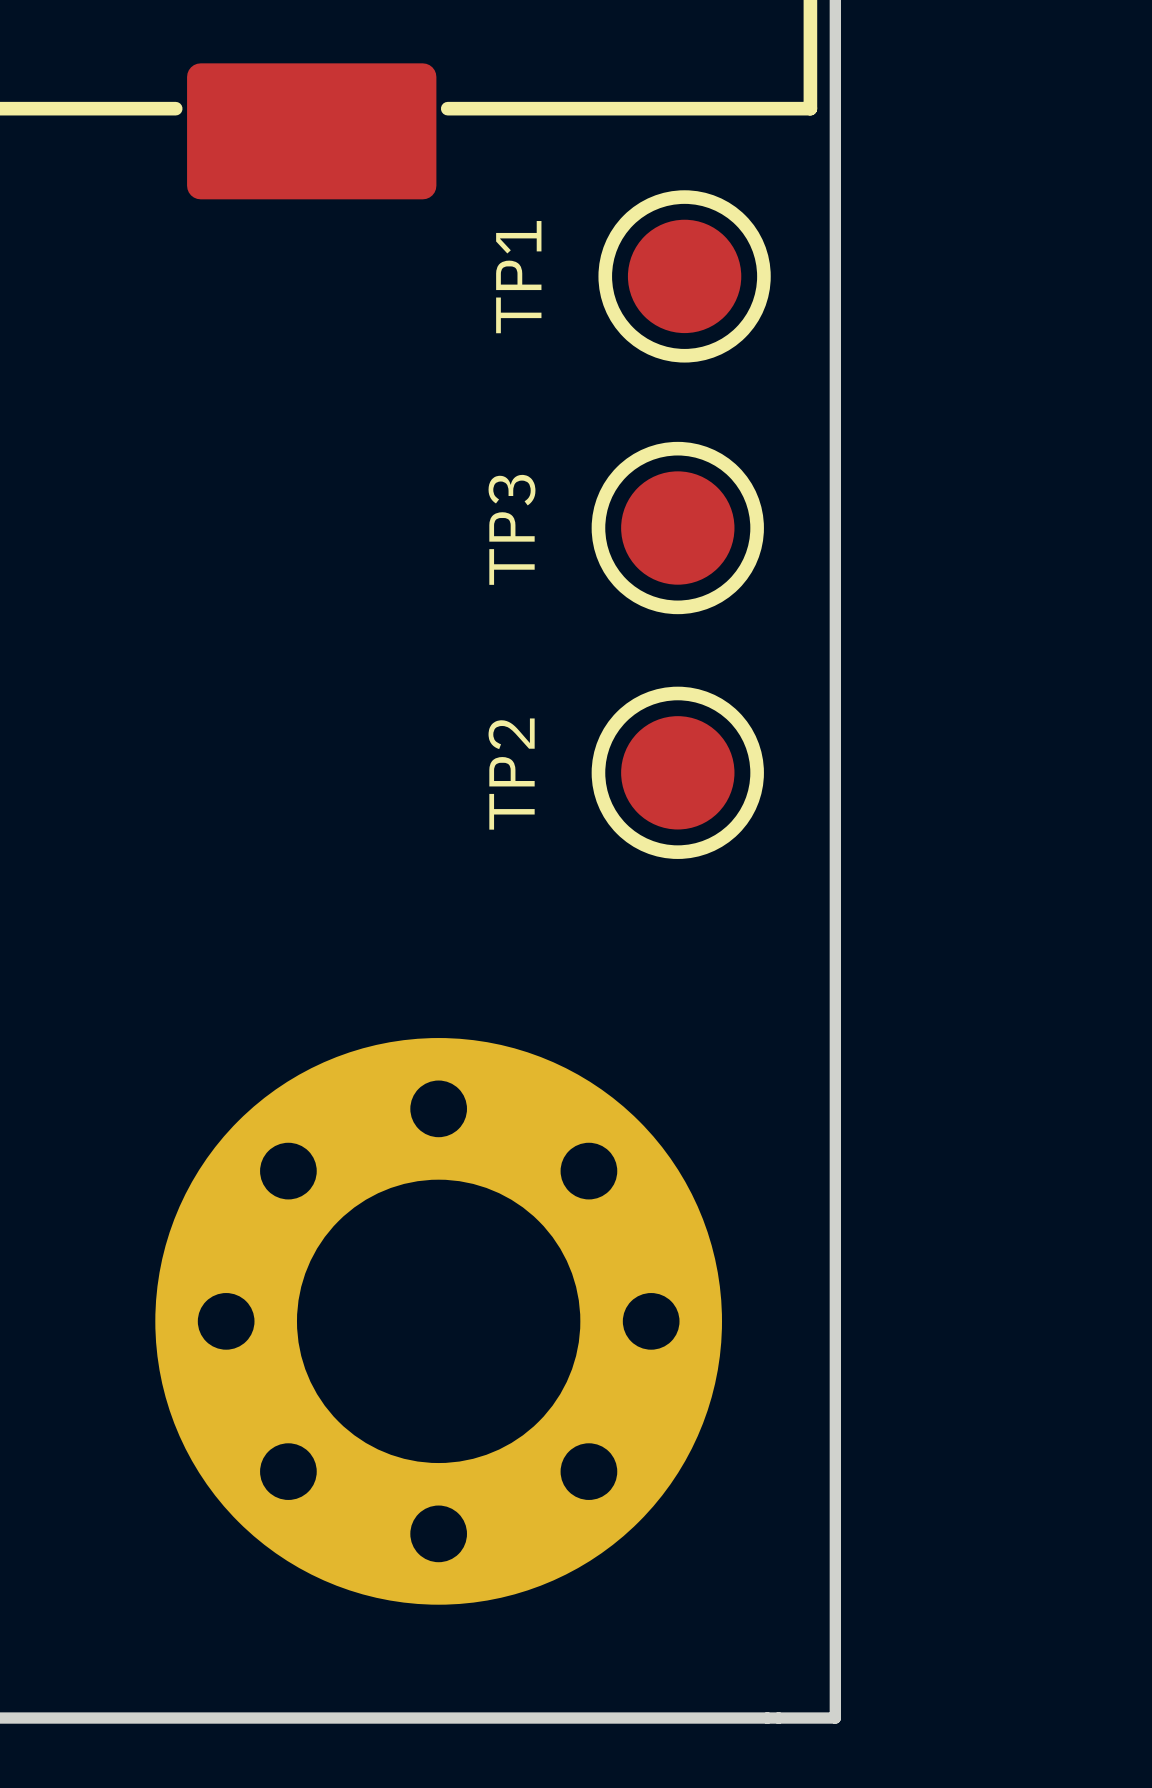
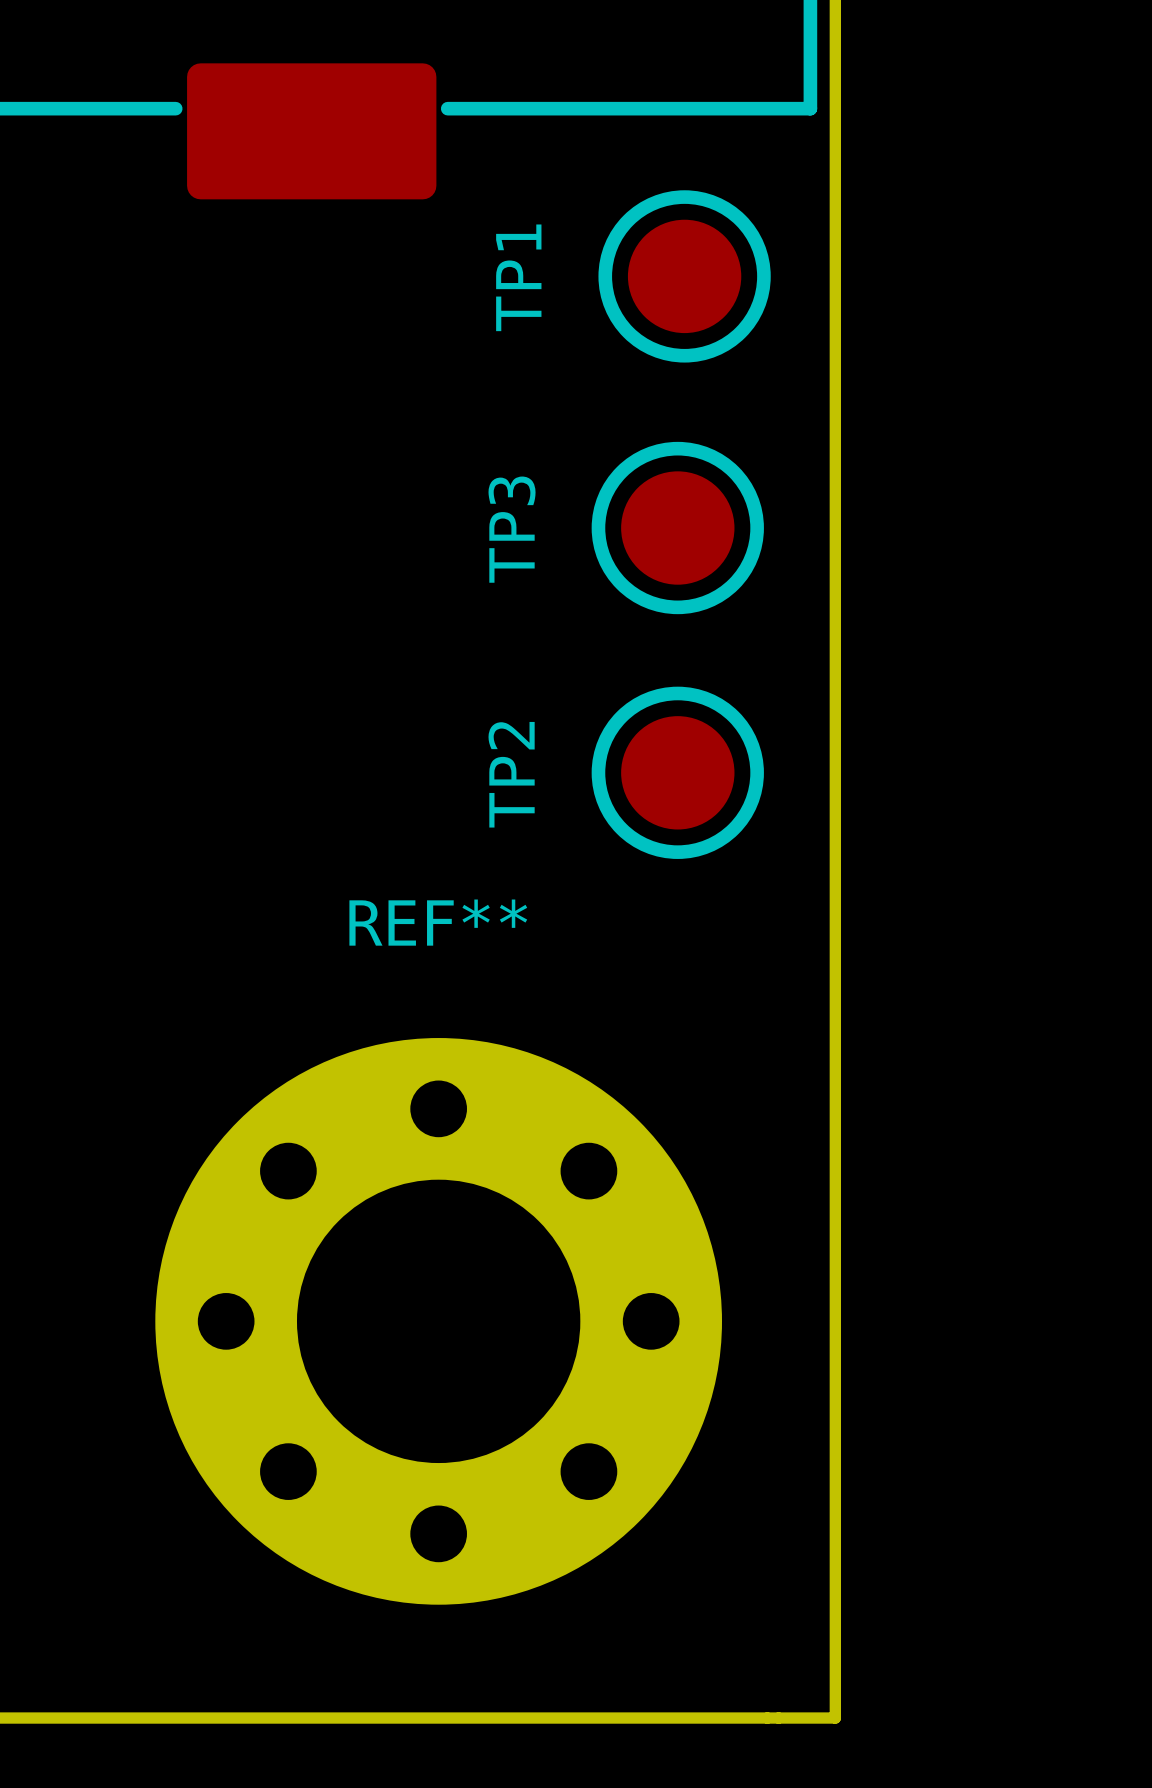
REF** name: none -> REF** (438, 922)

